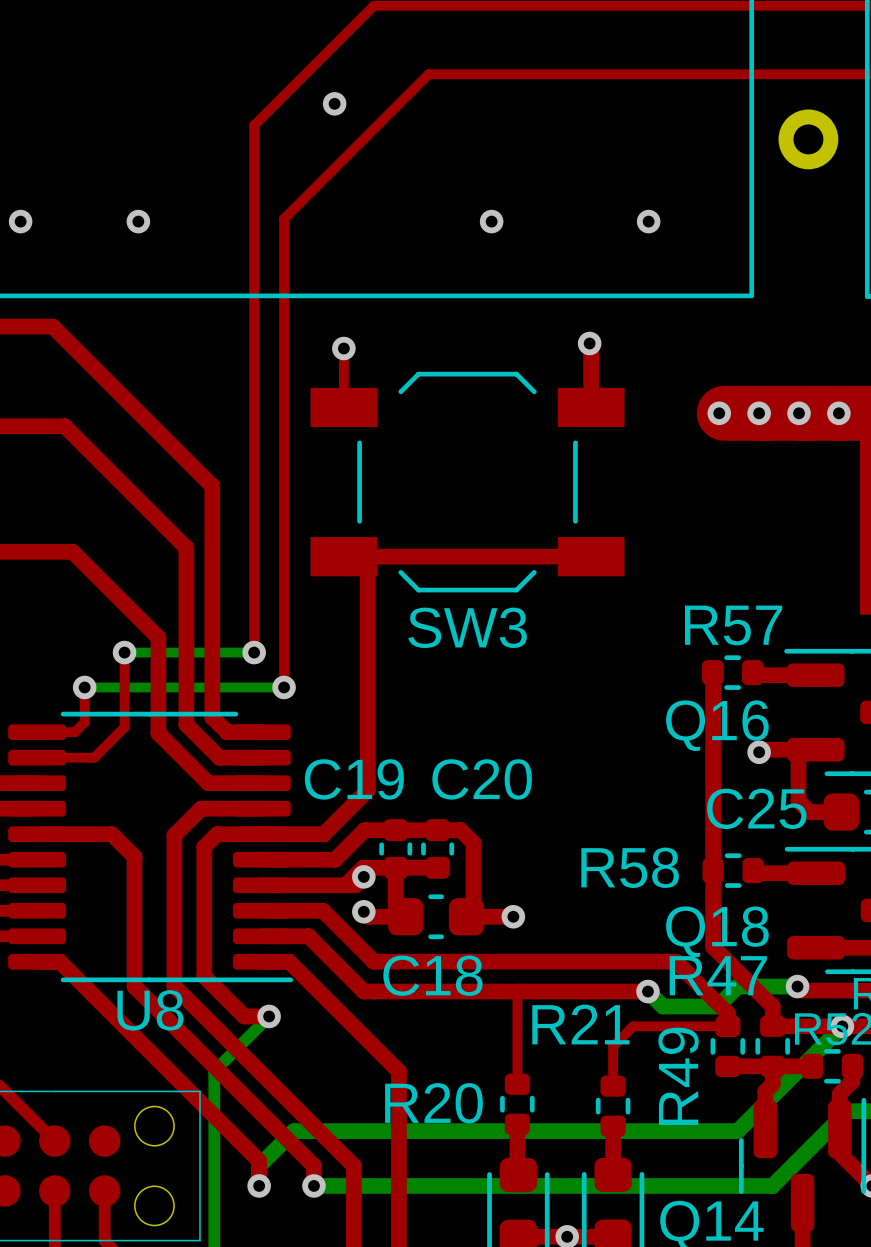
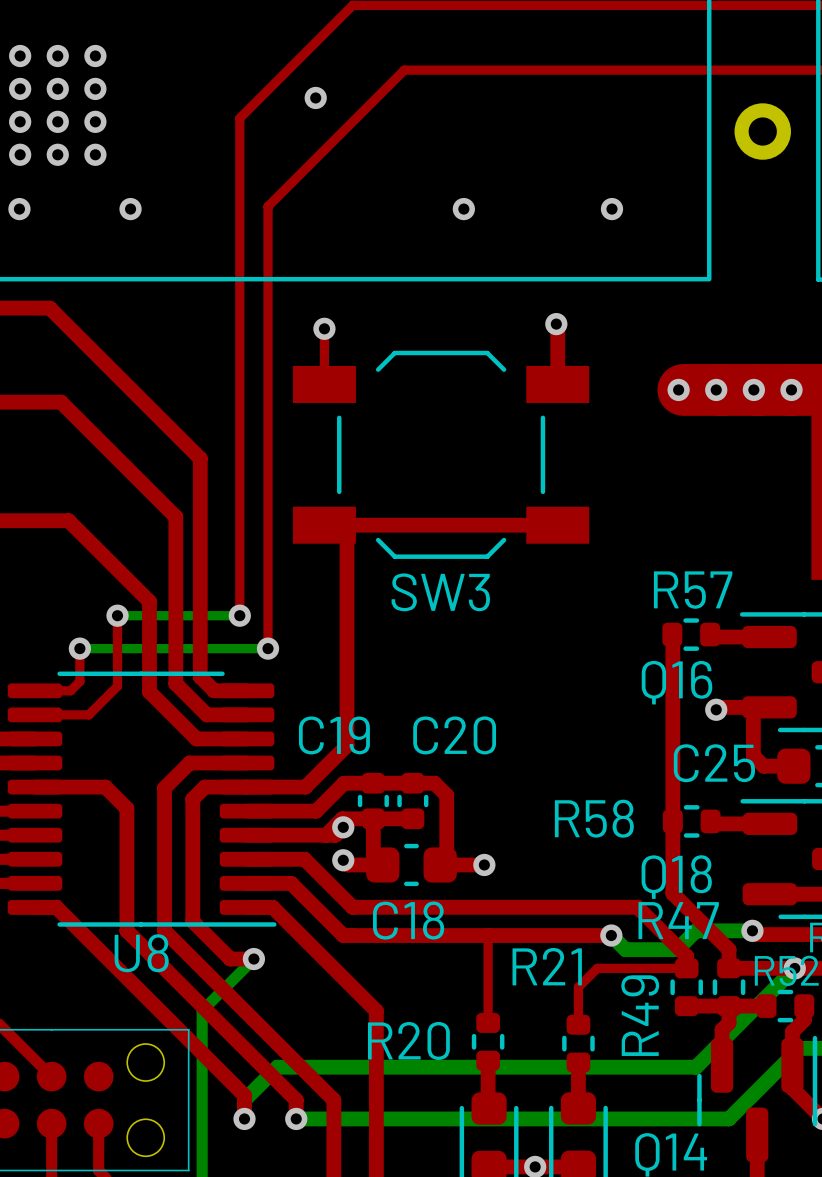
via: none -> (20, 56)
via: none -> (57, 56)
via: none -> (95, 56)
via: none -> (20, 88)
via: none -> (57, 88)
via: none -> (95, 88)
via: none -> (20, 121)
via: none -> (57, 121)
via: none -> (95, 121)
via: none -> (20, 154)
via: none -> (57, 154)
via: none -> (95, 154)

